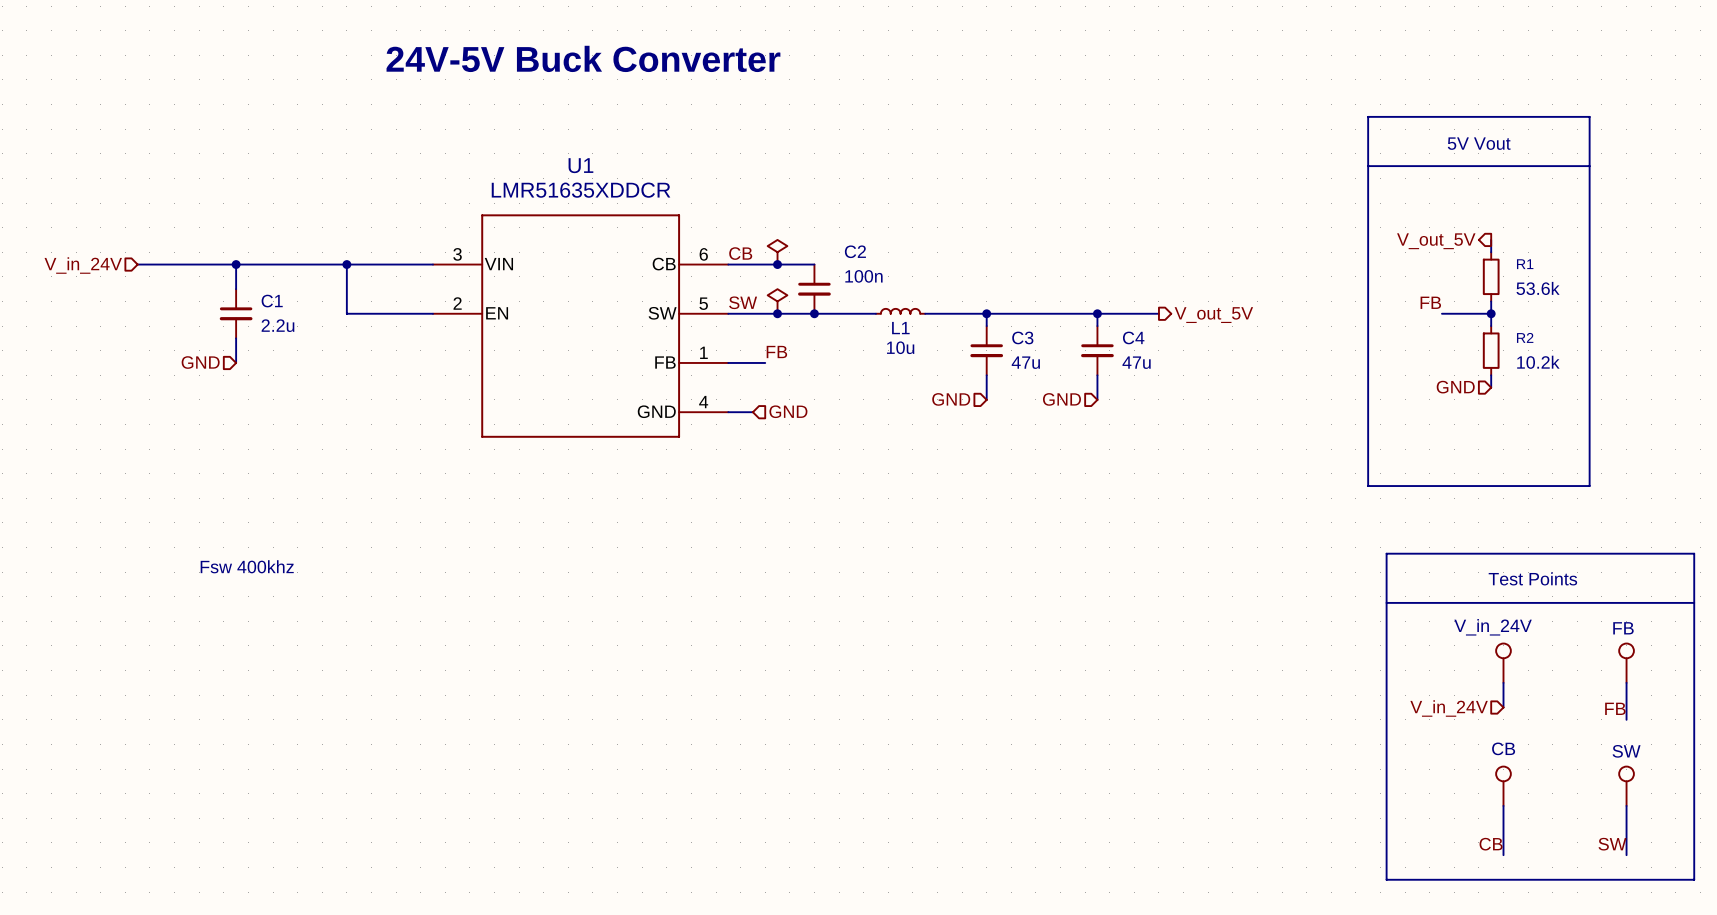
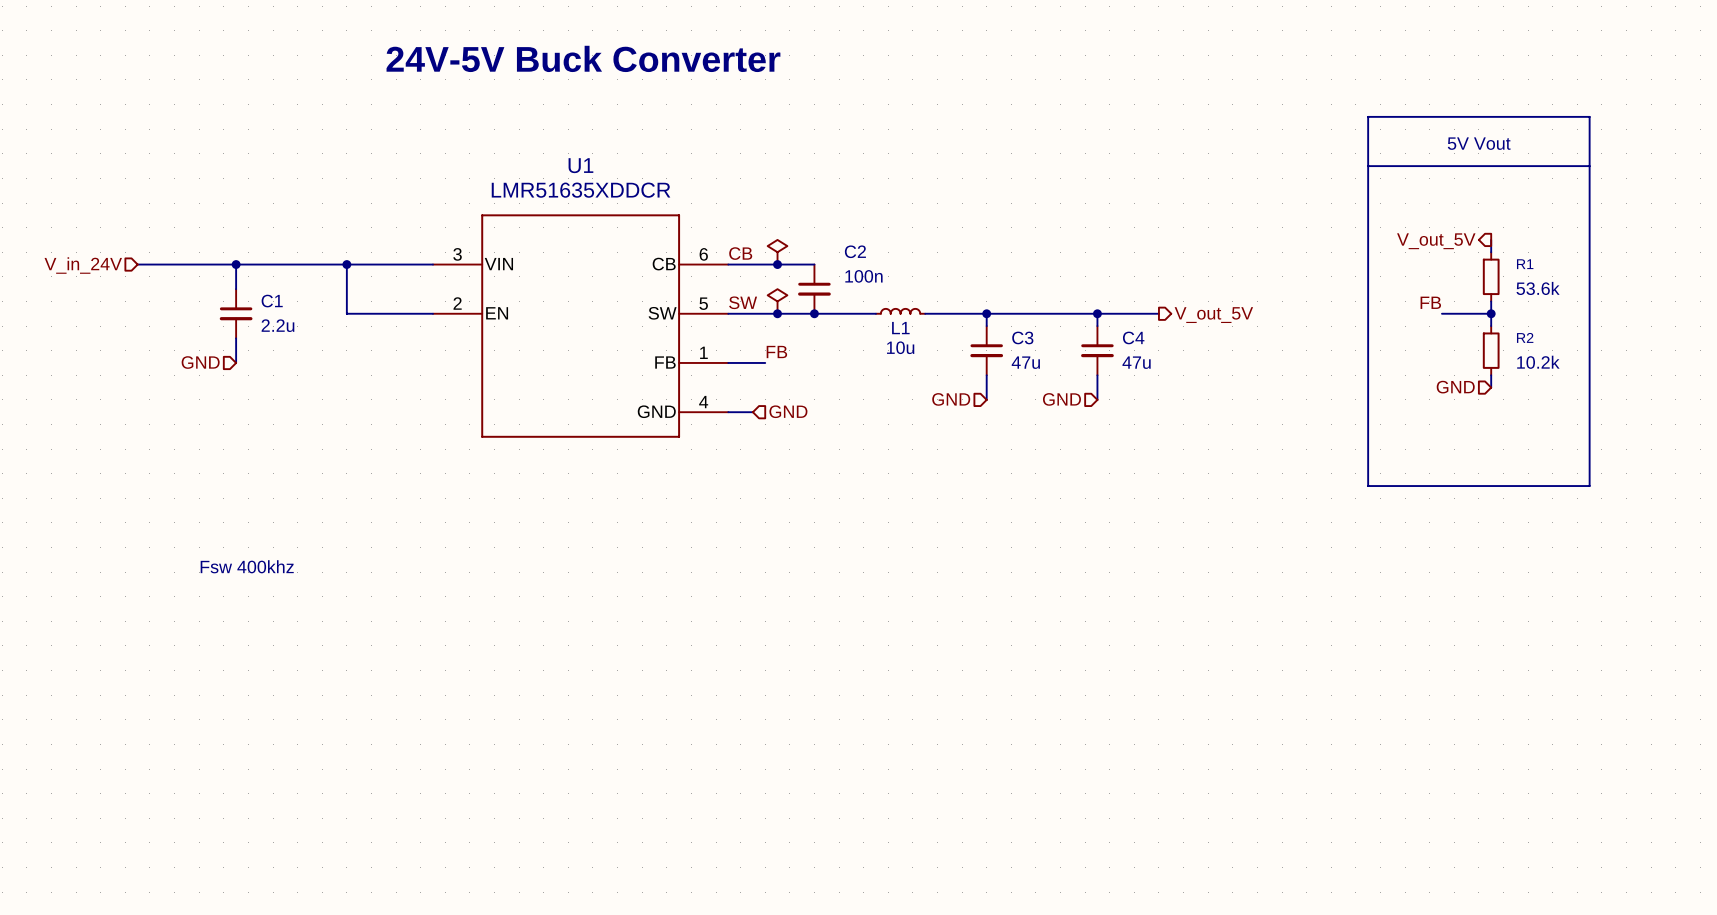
line: (1386, 553) (1694, 553) (1694, 879) (1386, 879) (1386, 553) -> none
text: Test Points (1532, 578) -> none
line: (1386, 602) (1694, 602) -> none
part: V_in_24V (1503, 663) -> none
part: FB (1626, 663) -> none
wire: (1503, 682) (1503, 707) -> none
wire: (1626, 682) (1626, 719) -> none
hierarchical label: V_in_24V (1449, 708) -> none
label: FB (1615, 708) -> none
part: CB (1503, 786) -> none
part: SW (1626, 786) -> none
wire: (1503, 805) (1503, 855) -> none
wire: (1626, 805) (1626, 855) -> none
label: CB (1491, 844) -> none
label: SW (1612, 844) -> none

